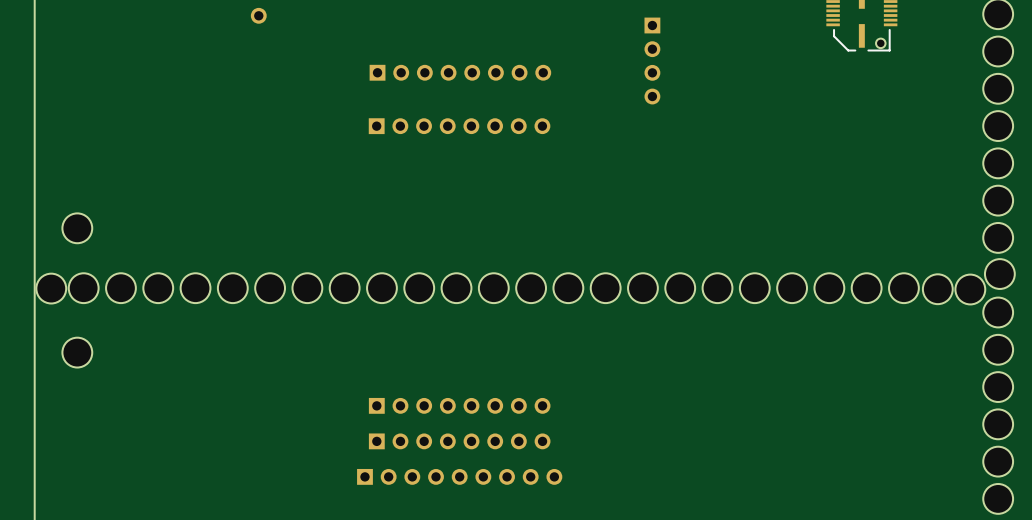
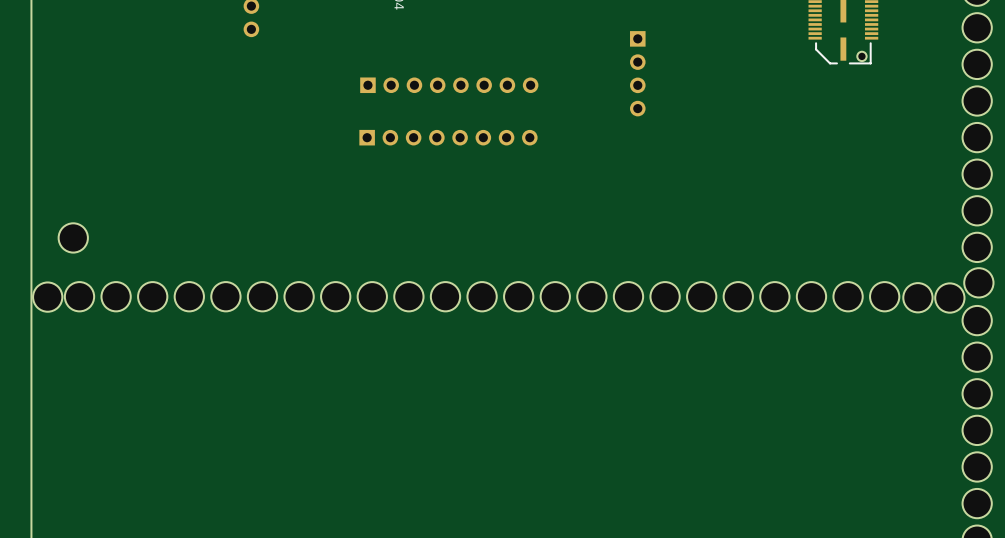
part: (77, 352) -> none
part: (459, 405) -> none
part: (459, 441) -> none
part: (459, 476) -> none

